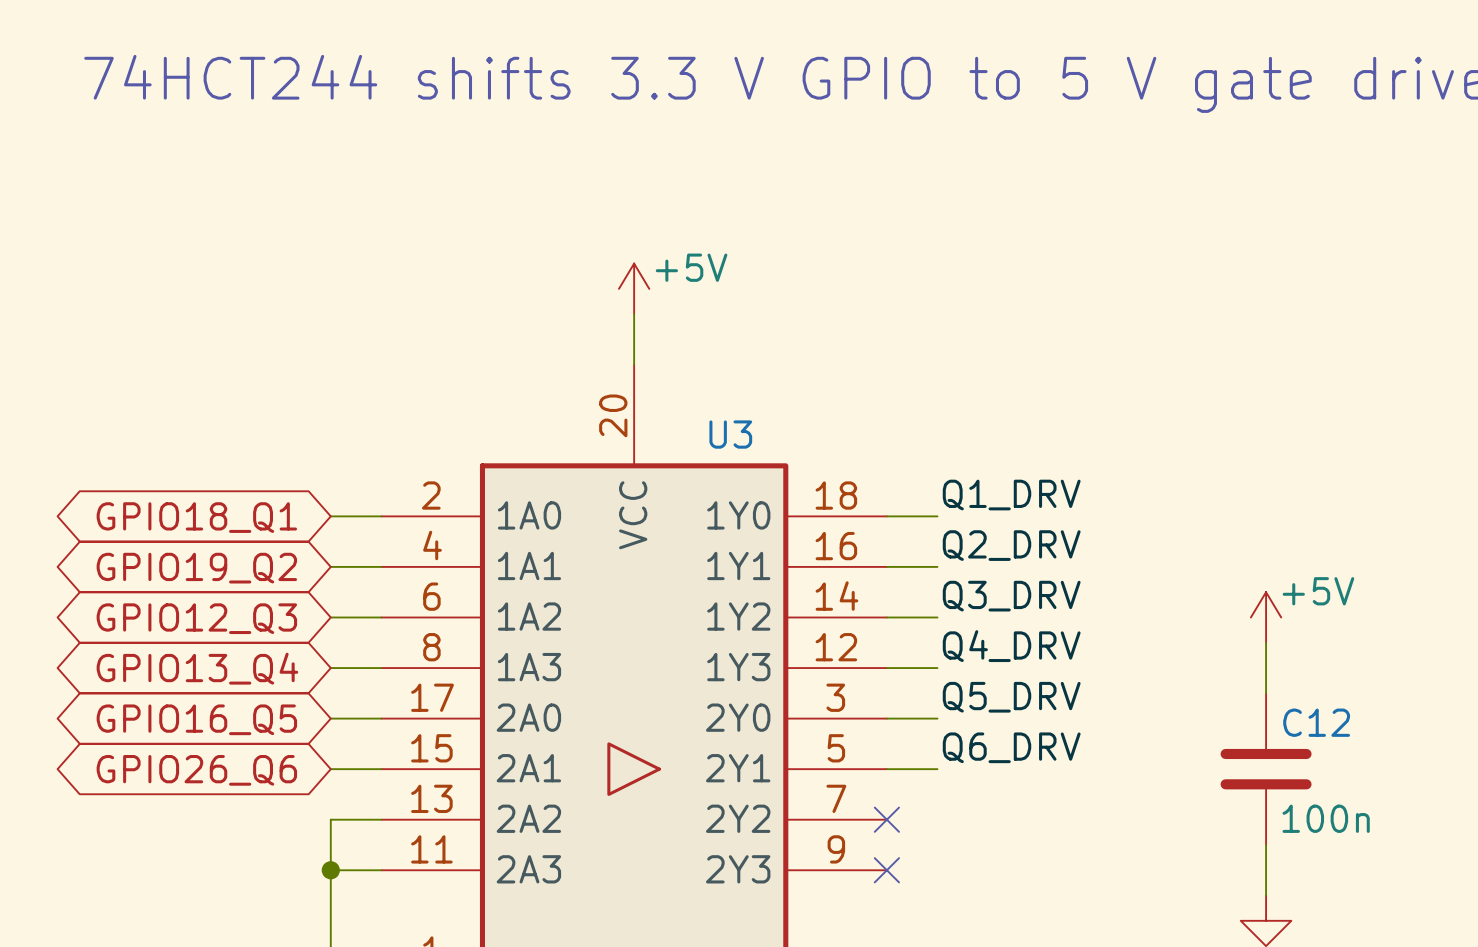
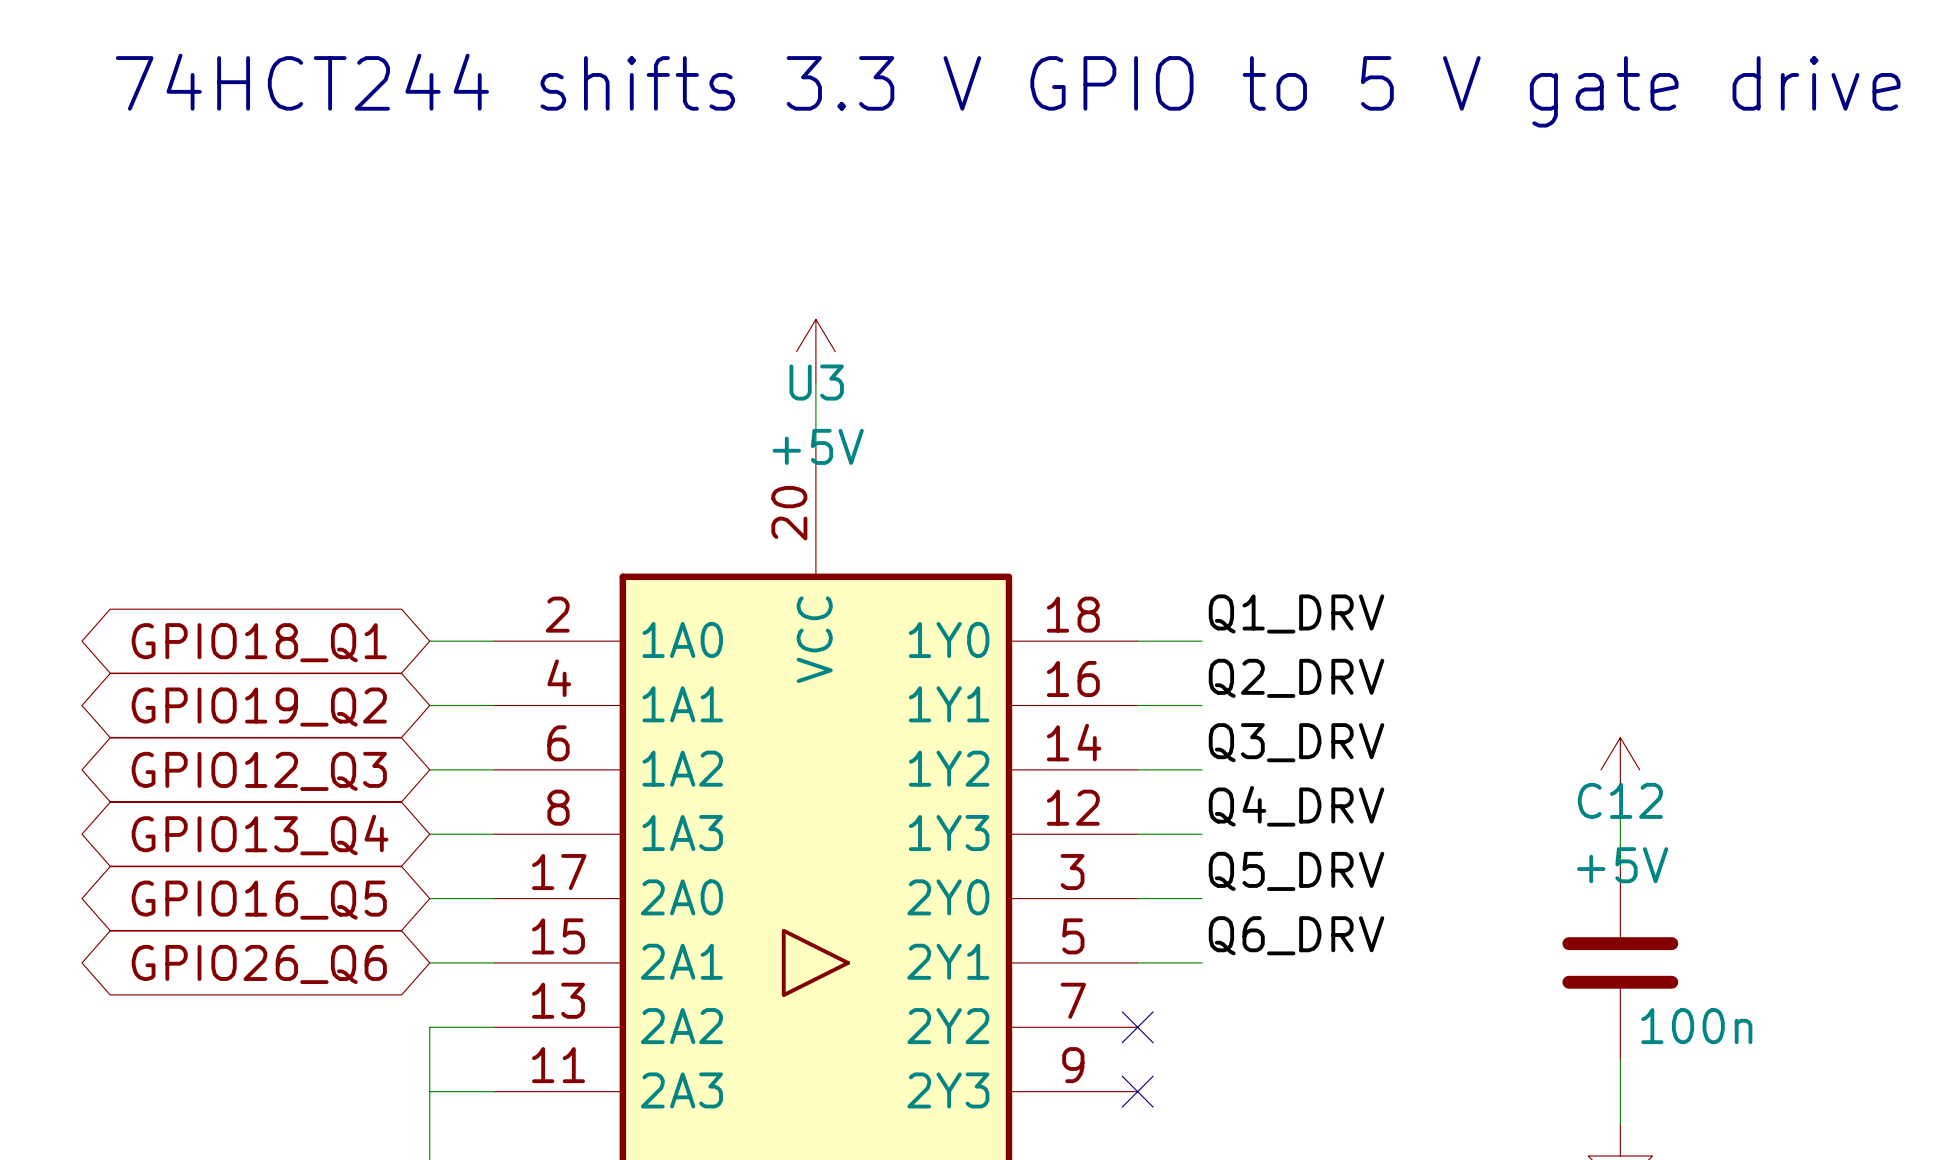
power symbol text position: +5V (691, 267) -> +5V (818, 446)
U3 name position: U3 (730, 434) -> U3 (816, 382)
power symbol text position: +5V (1318, 591) -> +5V (1622, 865)
C12 name position: C12 (1316, 722) -> C12 (1620, 800)
junction: (330, 870) -> none

